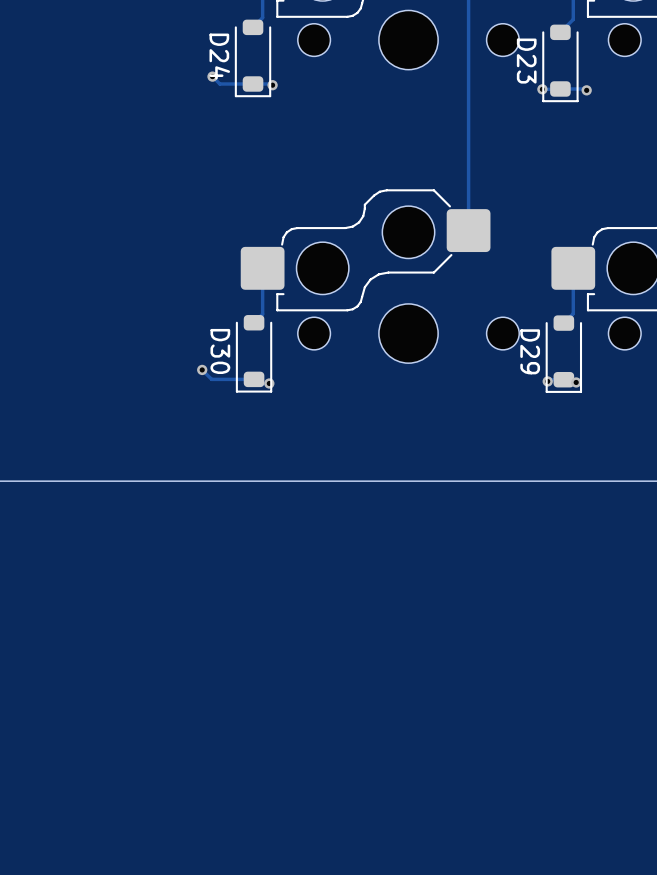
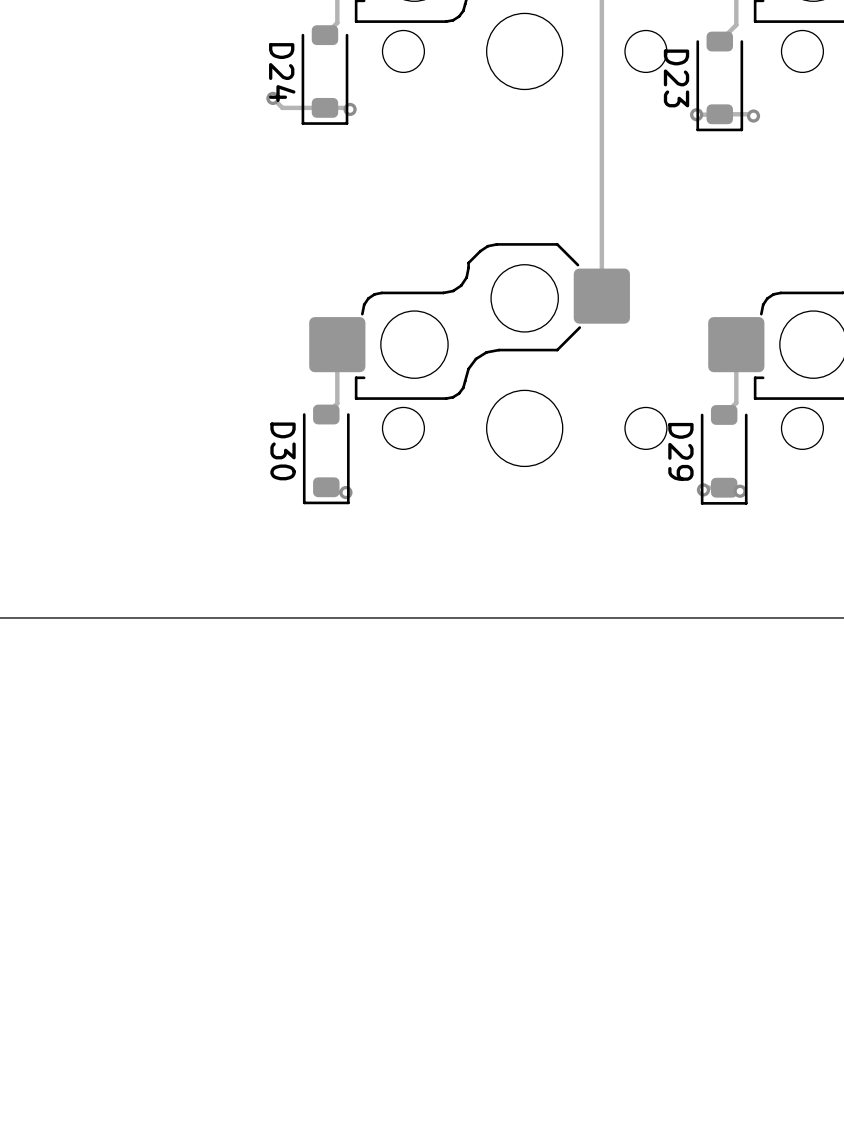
track: (202, 369) (211, 379) (254, 379) -> none
via: (202, 369) -> none

